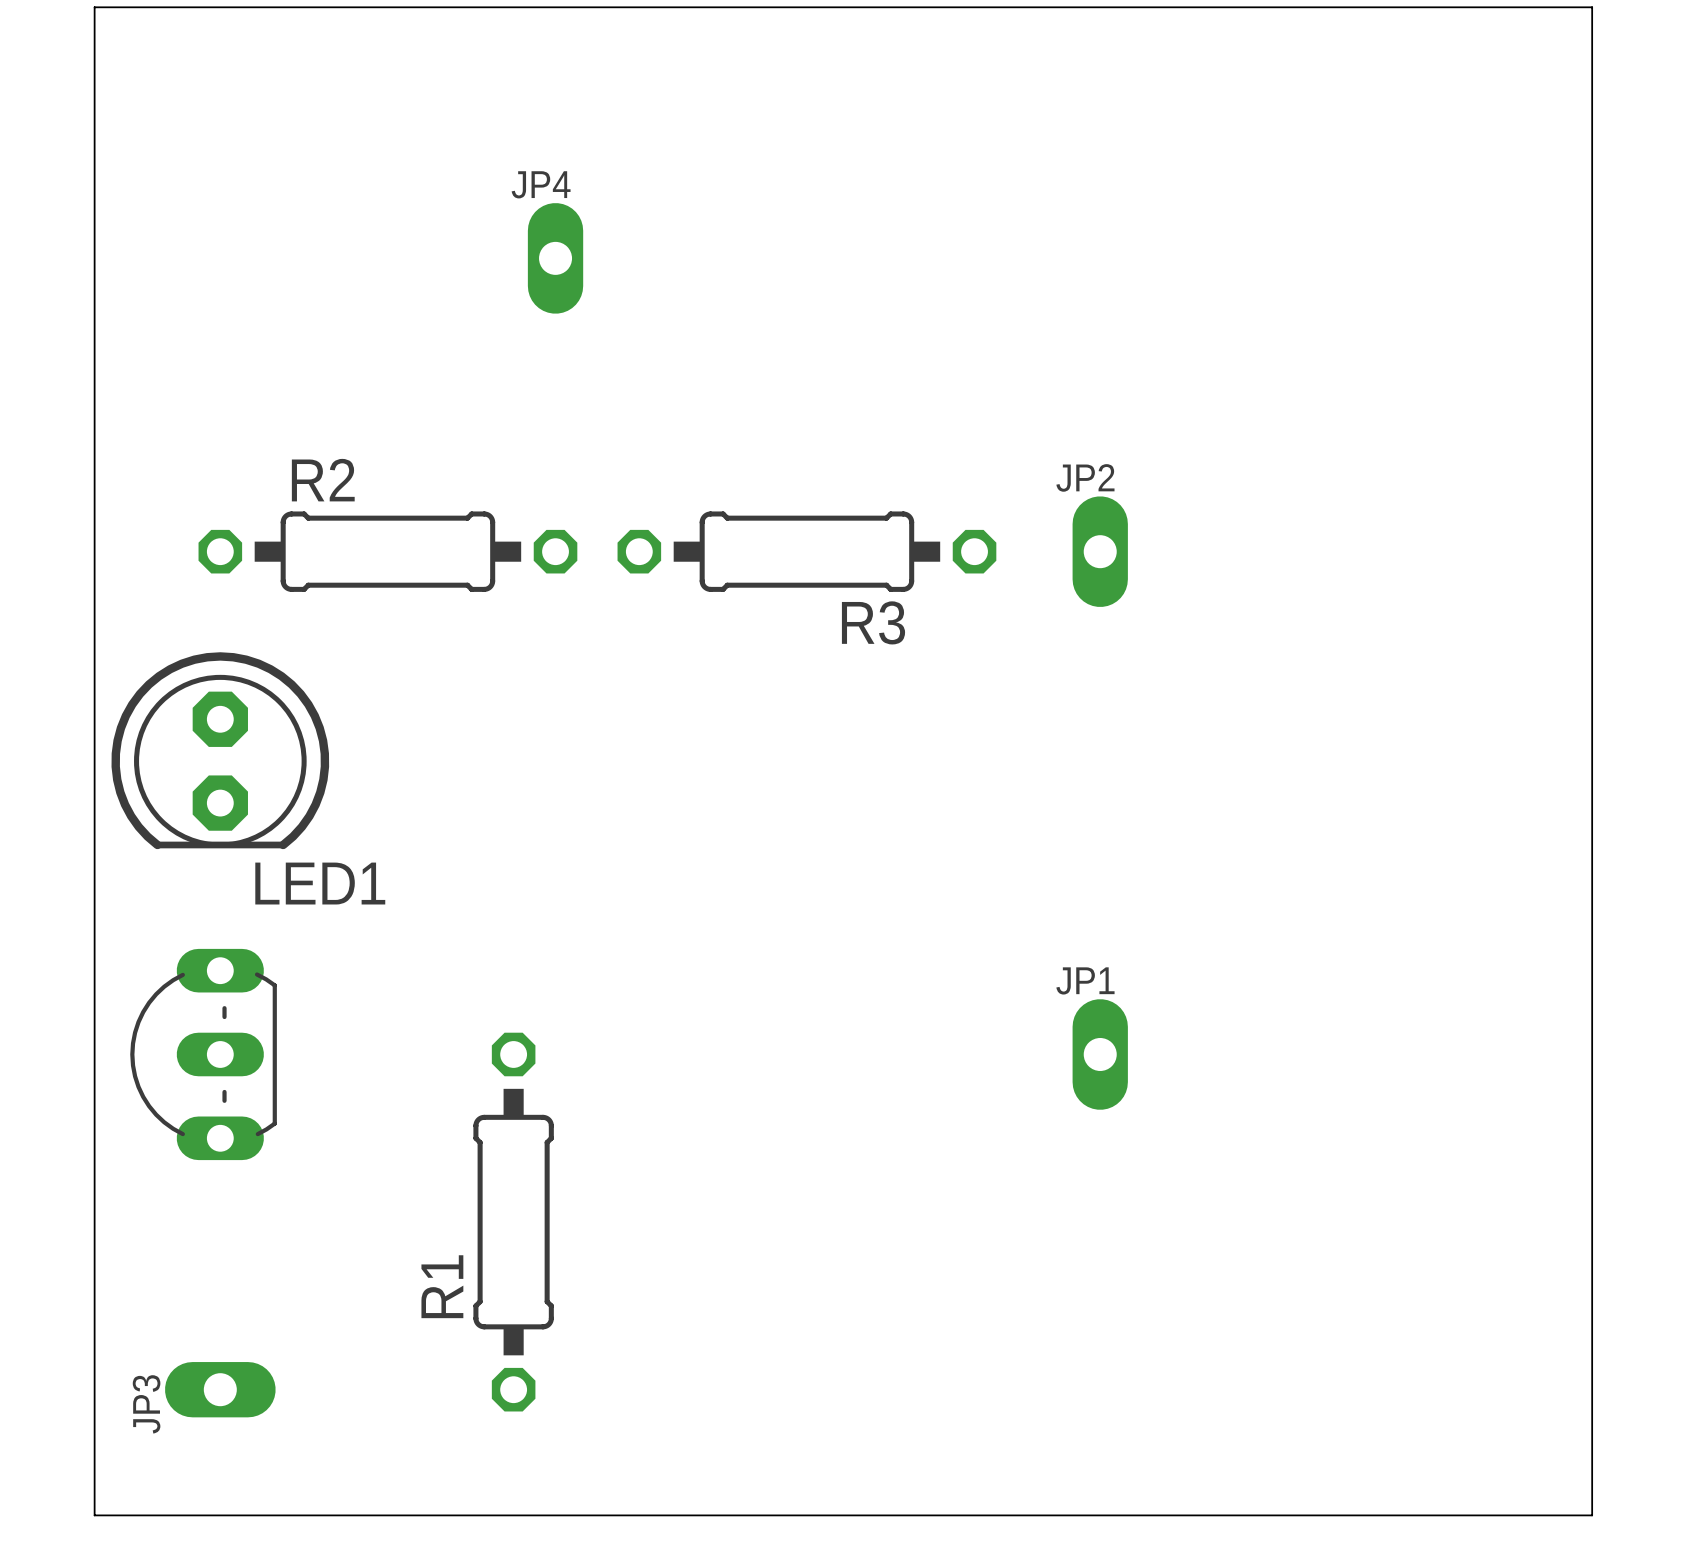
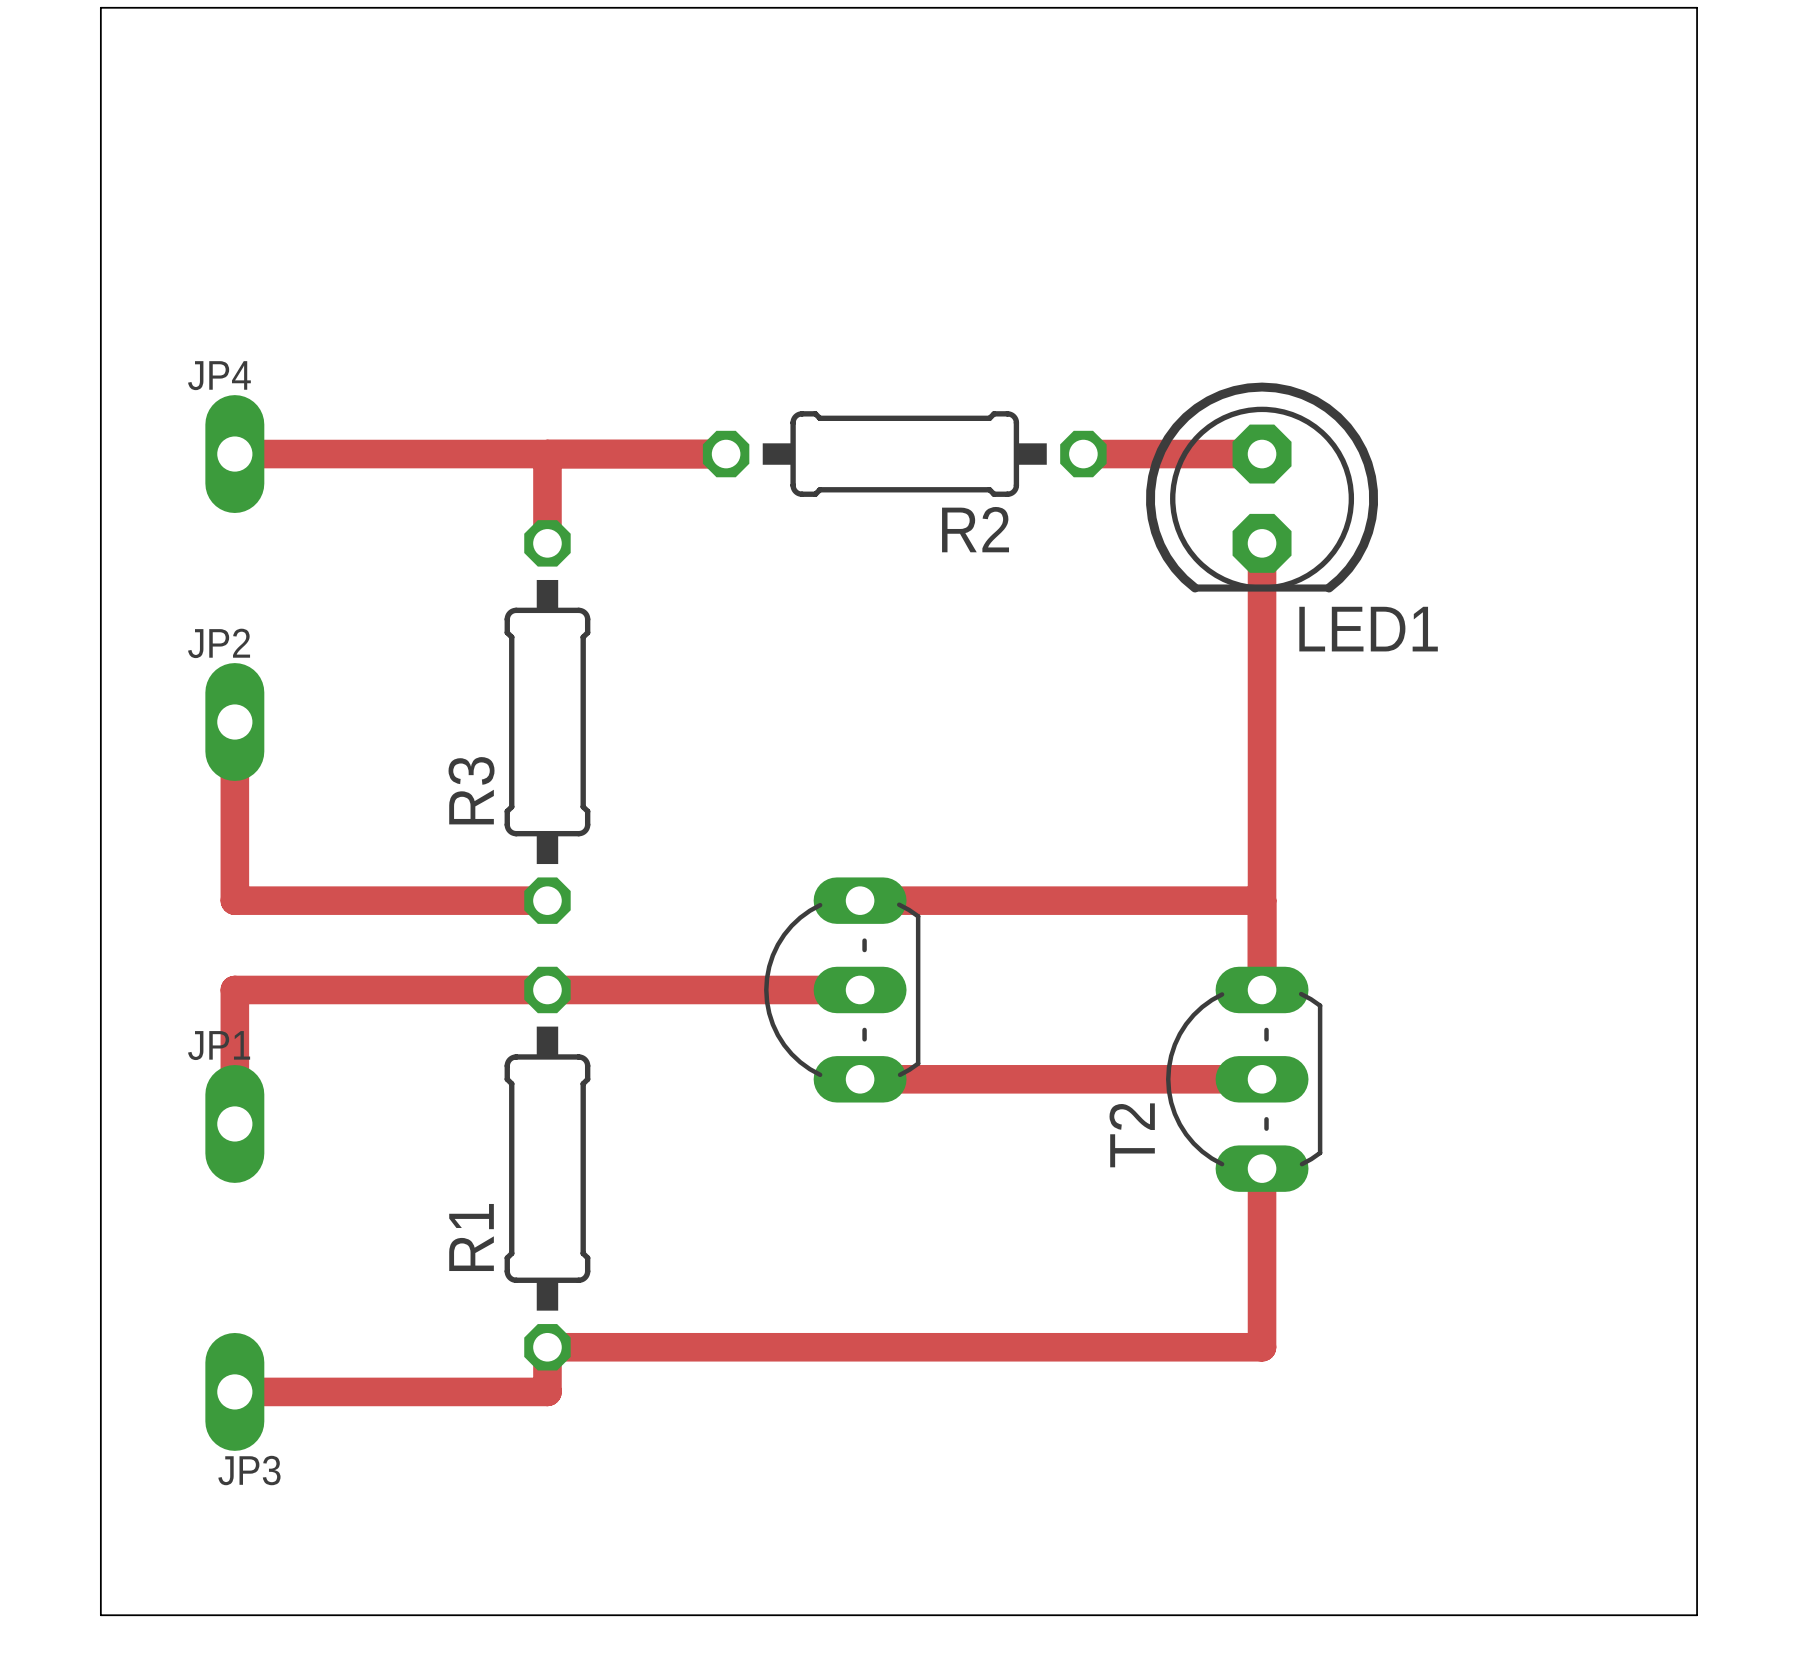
JP4 position: (555, 258) -> (234, 454)
top track: none -> (234, 454) (726, 454)
top track: none -> (547, 454) (547, 543)
top track: none -> (1083, 454) (1262, 454)
R2 name position: R2 (323, 480) -> R2 (975, 529)
top track: none -> (1262, 543) (1262, 989)
R2 position: (387, 551) -> (904, 454)
R3 rotation: 0° (806, 551) -> 90° clockwise (547, 722)
R3 position: (806, 551) -> (547, 722)
JP2 position: (1100, 551) -> (234, 722)
top track: none -> (234, 722) (234, 900) (547, 900)
LED1 position: (220, 750) -> (1262, 487)
top track: none -> (860, 900) (1262, 900)
top track: none -> (860, 989) (234, 989) (234, 1123)
top track: none -> (860, 1079) (1262, 1079)
T2: none -> (1244, 1079)
part position: (203, 1054) -> (842, 989)
JP1 position: (1100, 1054) -> (234, 1123)
top track: none -> (1262, 1168) (1262, 1347) (547, 1347) (547, 1391) (234, 1391)
R1 position: (513, 1222) -> (547, 1168)
JP3 rotation: 0° (220, 1389) -> 90° clockwise (234, 1391)
JP3 position: (220, 1389) -> (234, 1391)
JP3 name position: JP3 (146, 1404) -> JP3 (249, 1470)

